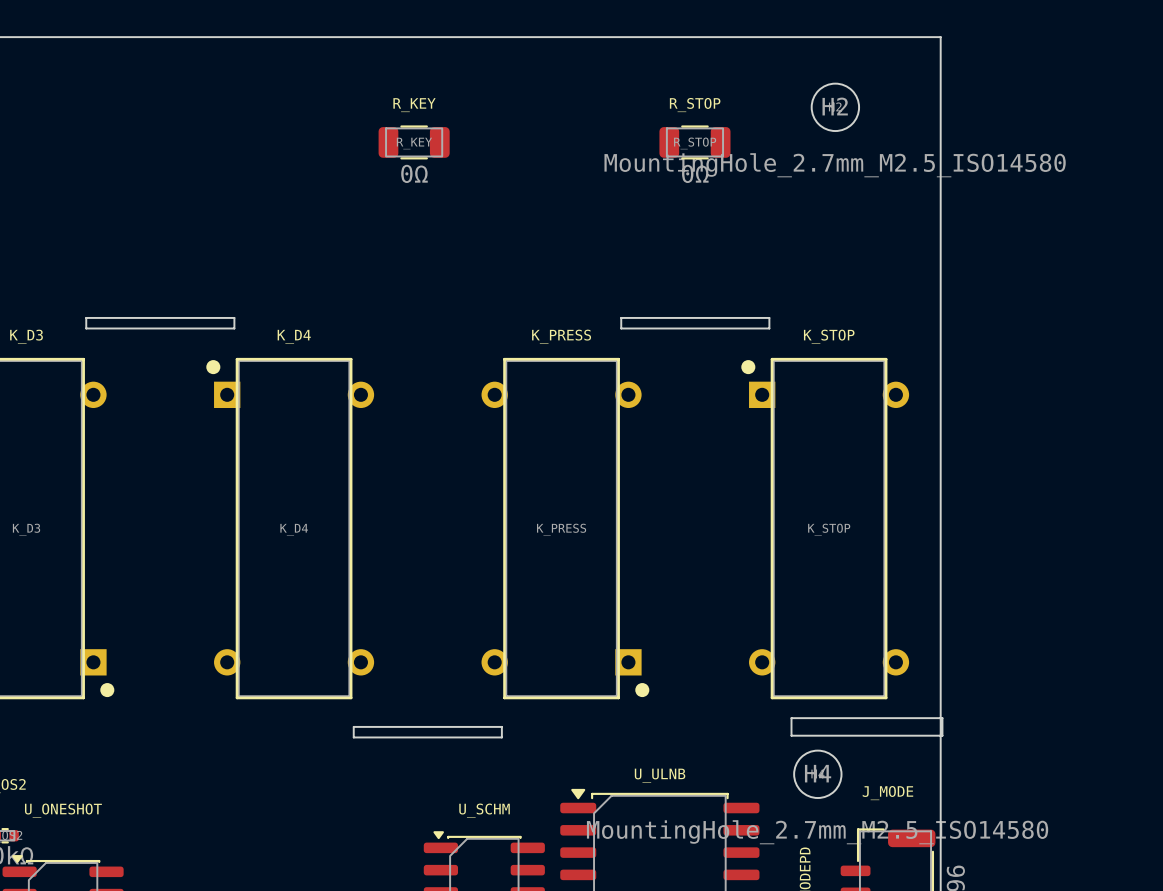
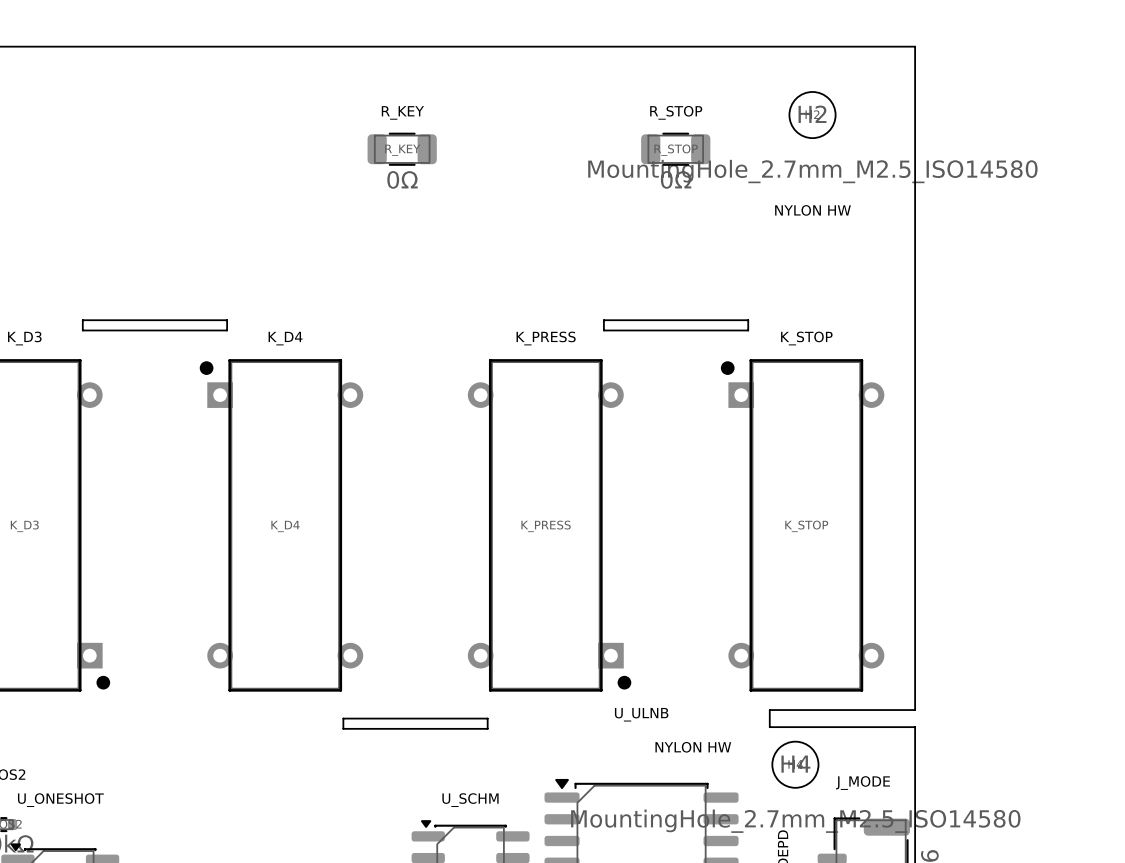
text: none -> NYLON HW (812, 210)
board edge: (940, 718) (942, 718) (942, 735) (940, 735) (940, 718) -> none
text: none -> NYLON HW (693, 747)
U_ULNB name position: U_ULNB (660, 775) -> U_ULNB (641, 714)

